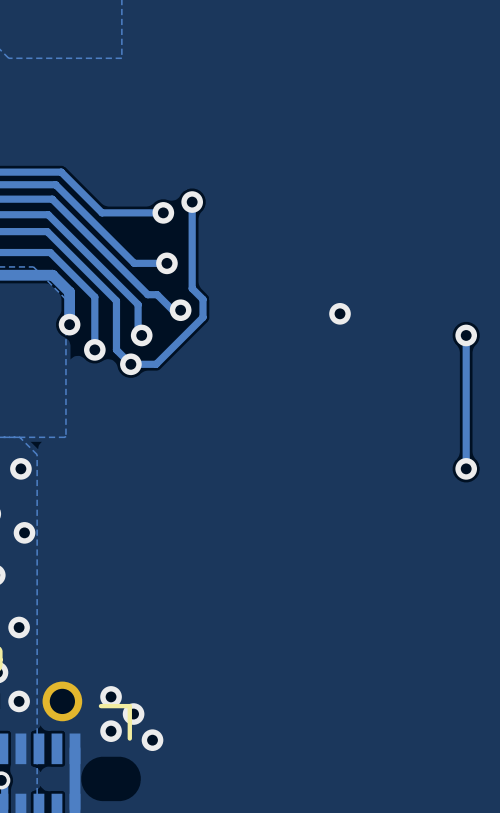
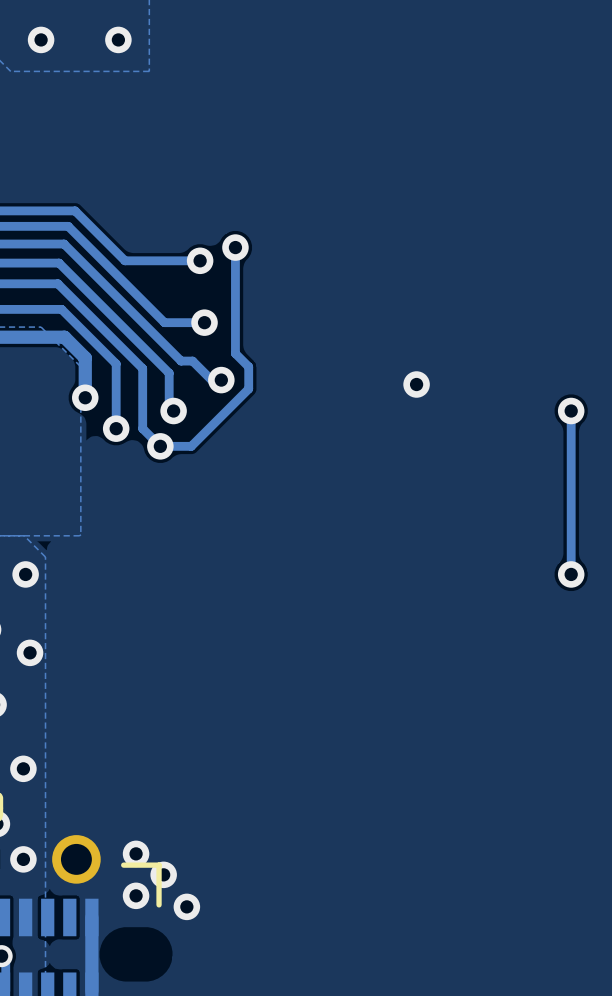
via: none -> (41, 39)
via: none -> (118, 39)

